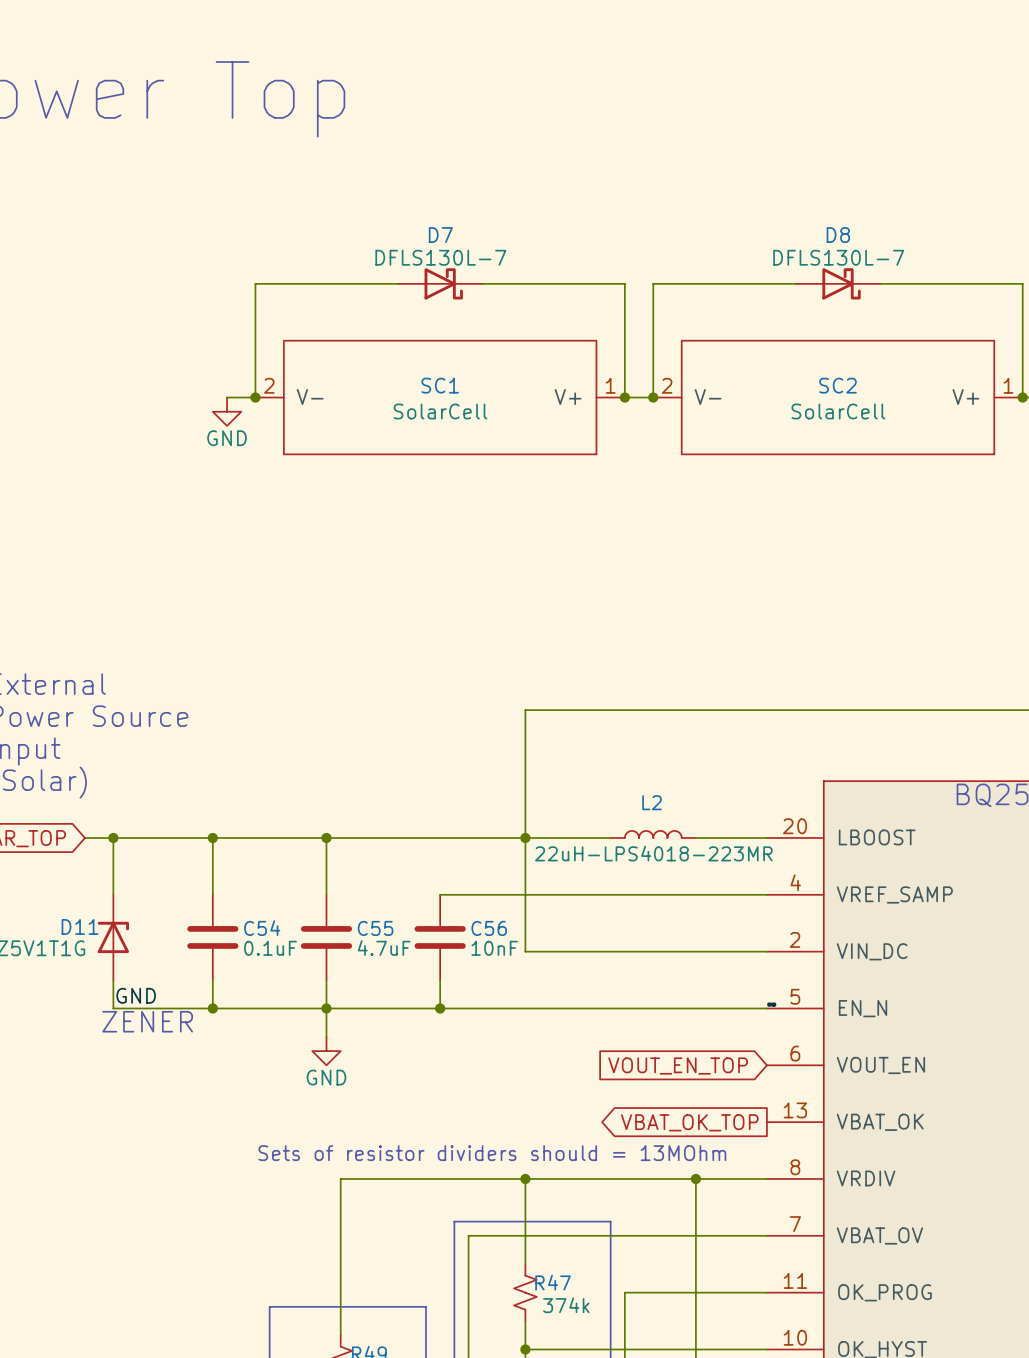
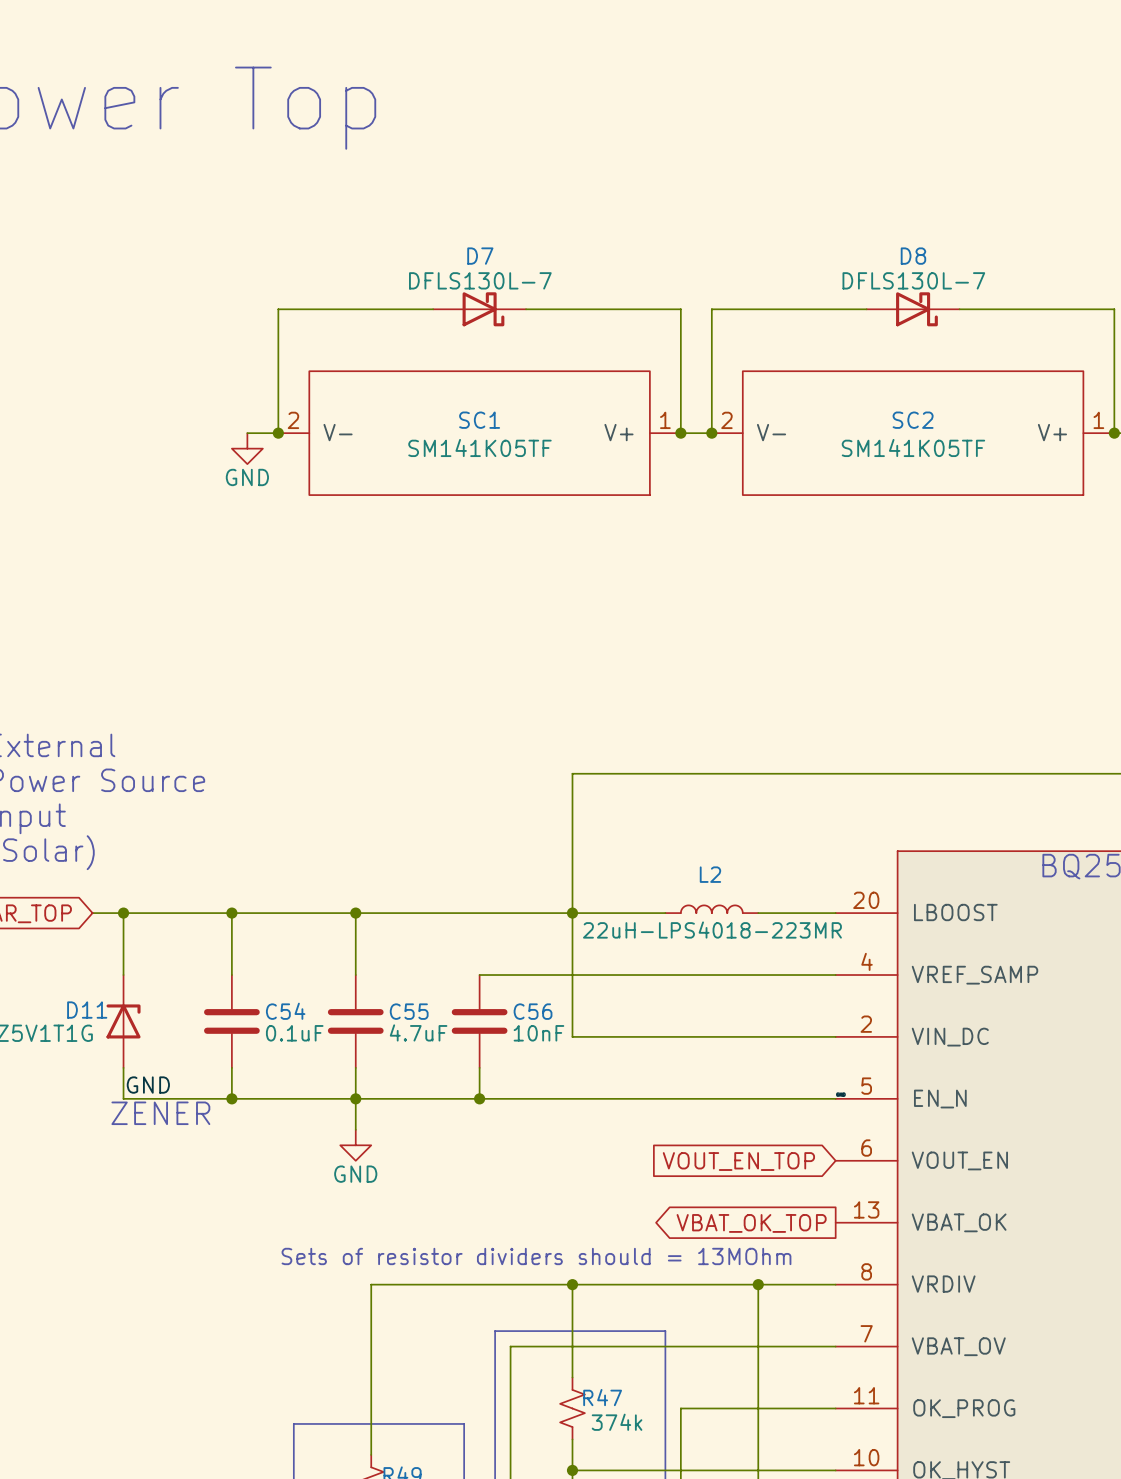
SC1 value: SolarCell (440, 411) -> SM141K05TF (479, 447)
SC2 value: SolarCell (838, 411) -> SM141K05TF (913, 447)

